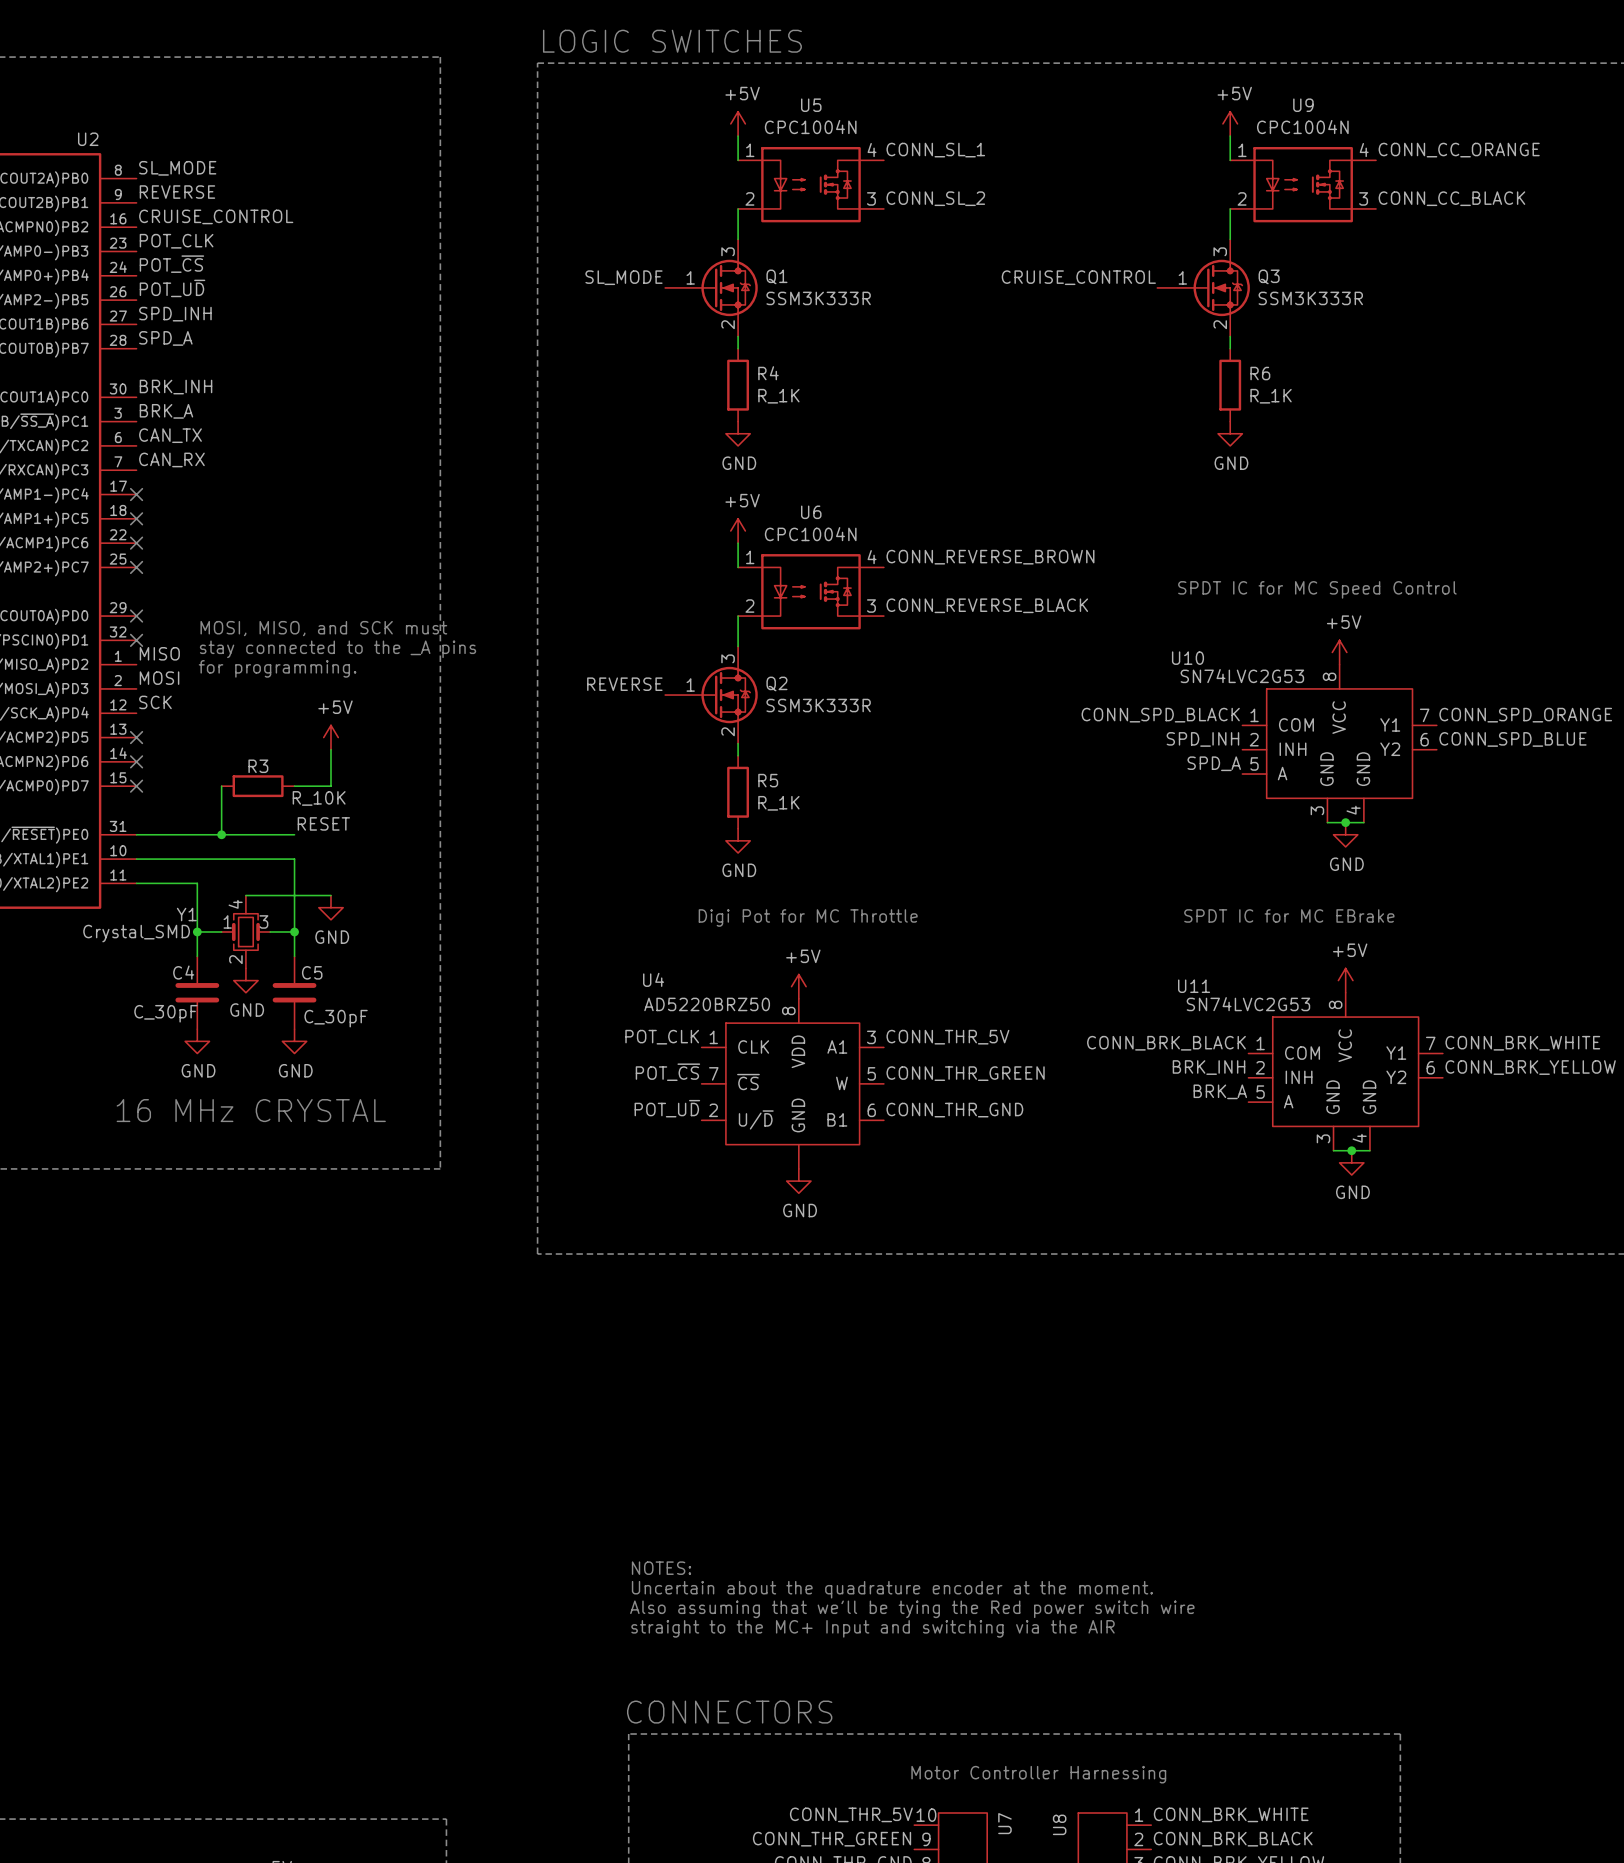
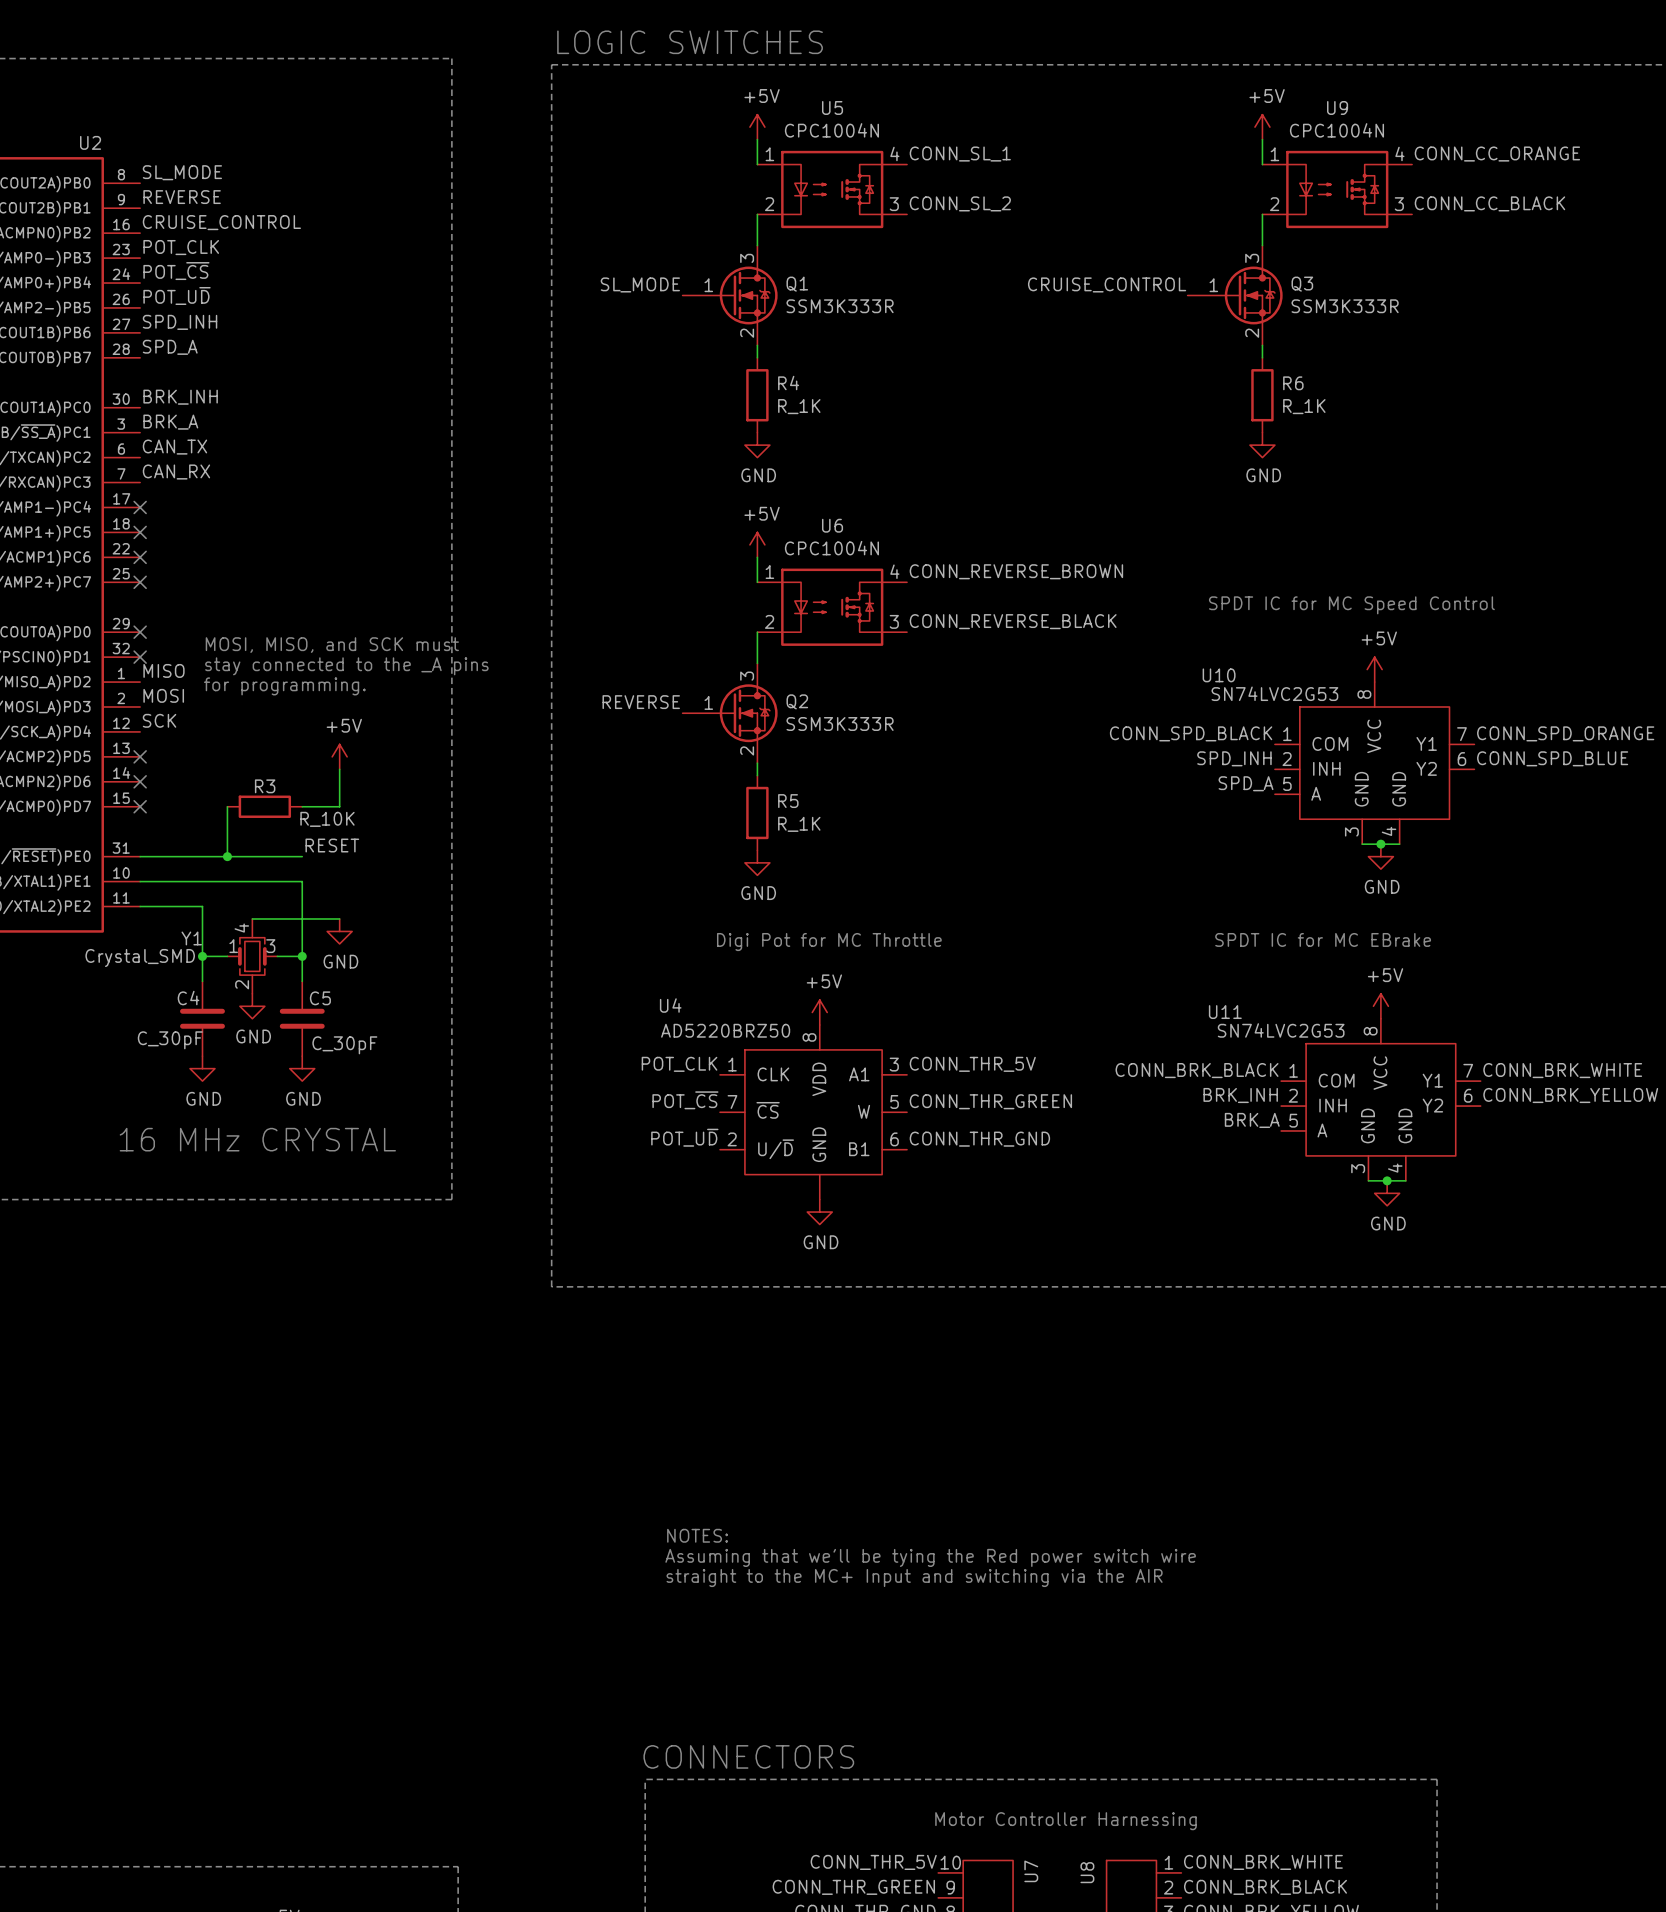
text: none -> Assuming that we'll be tying the Red power switch wire (930, 1557)
text position: NOTES: (661, 1568) -> NOTES: (697, 1535)
text: Uncertain about the quadrature encoder at the moment. (892, 1589) -> none
text: Also assuming that we'll be tying the Red power switch wire (912, 1609) -> none
text position: straight to the MC+ Input and switching via the AIR (872, 1628) -> straight to the MC+ Input and switching via the AIR (914, 1578)

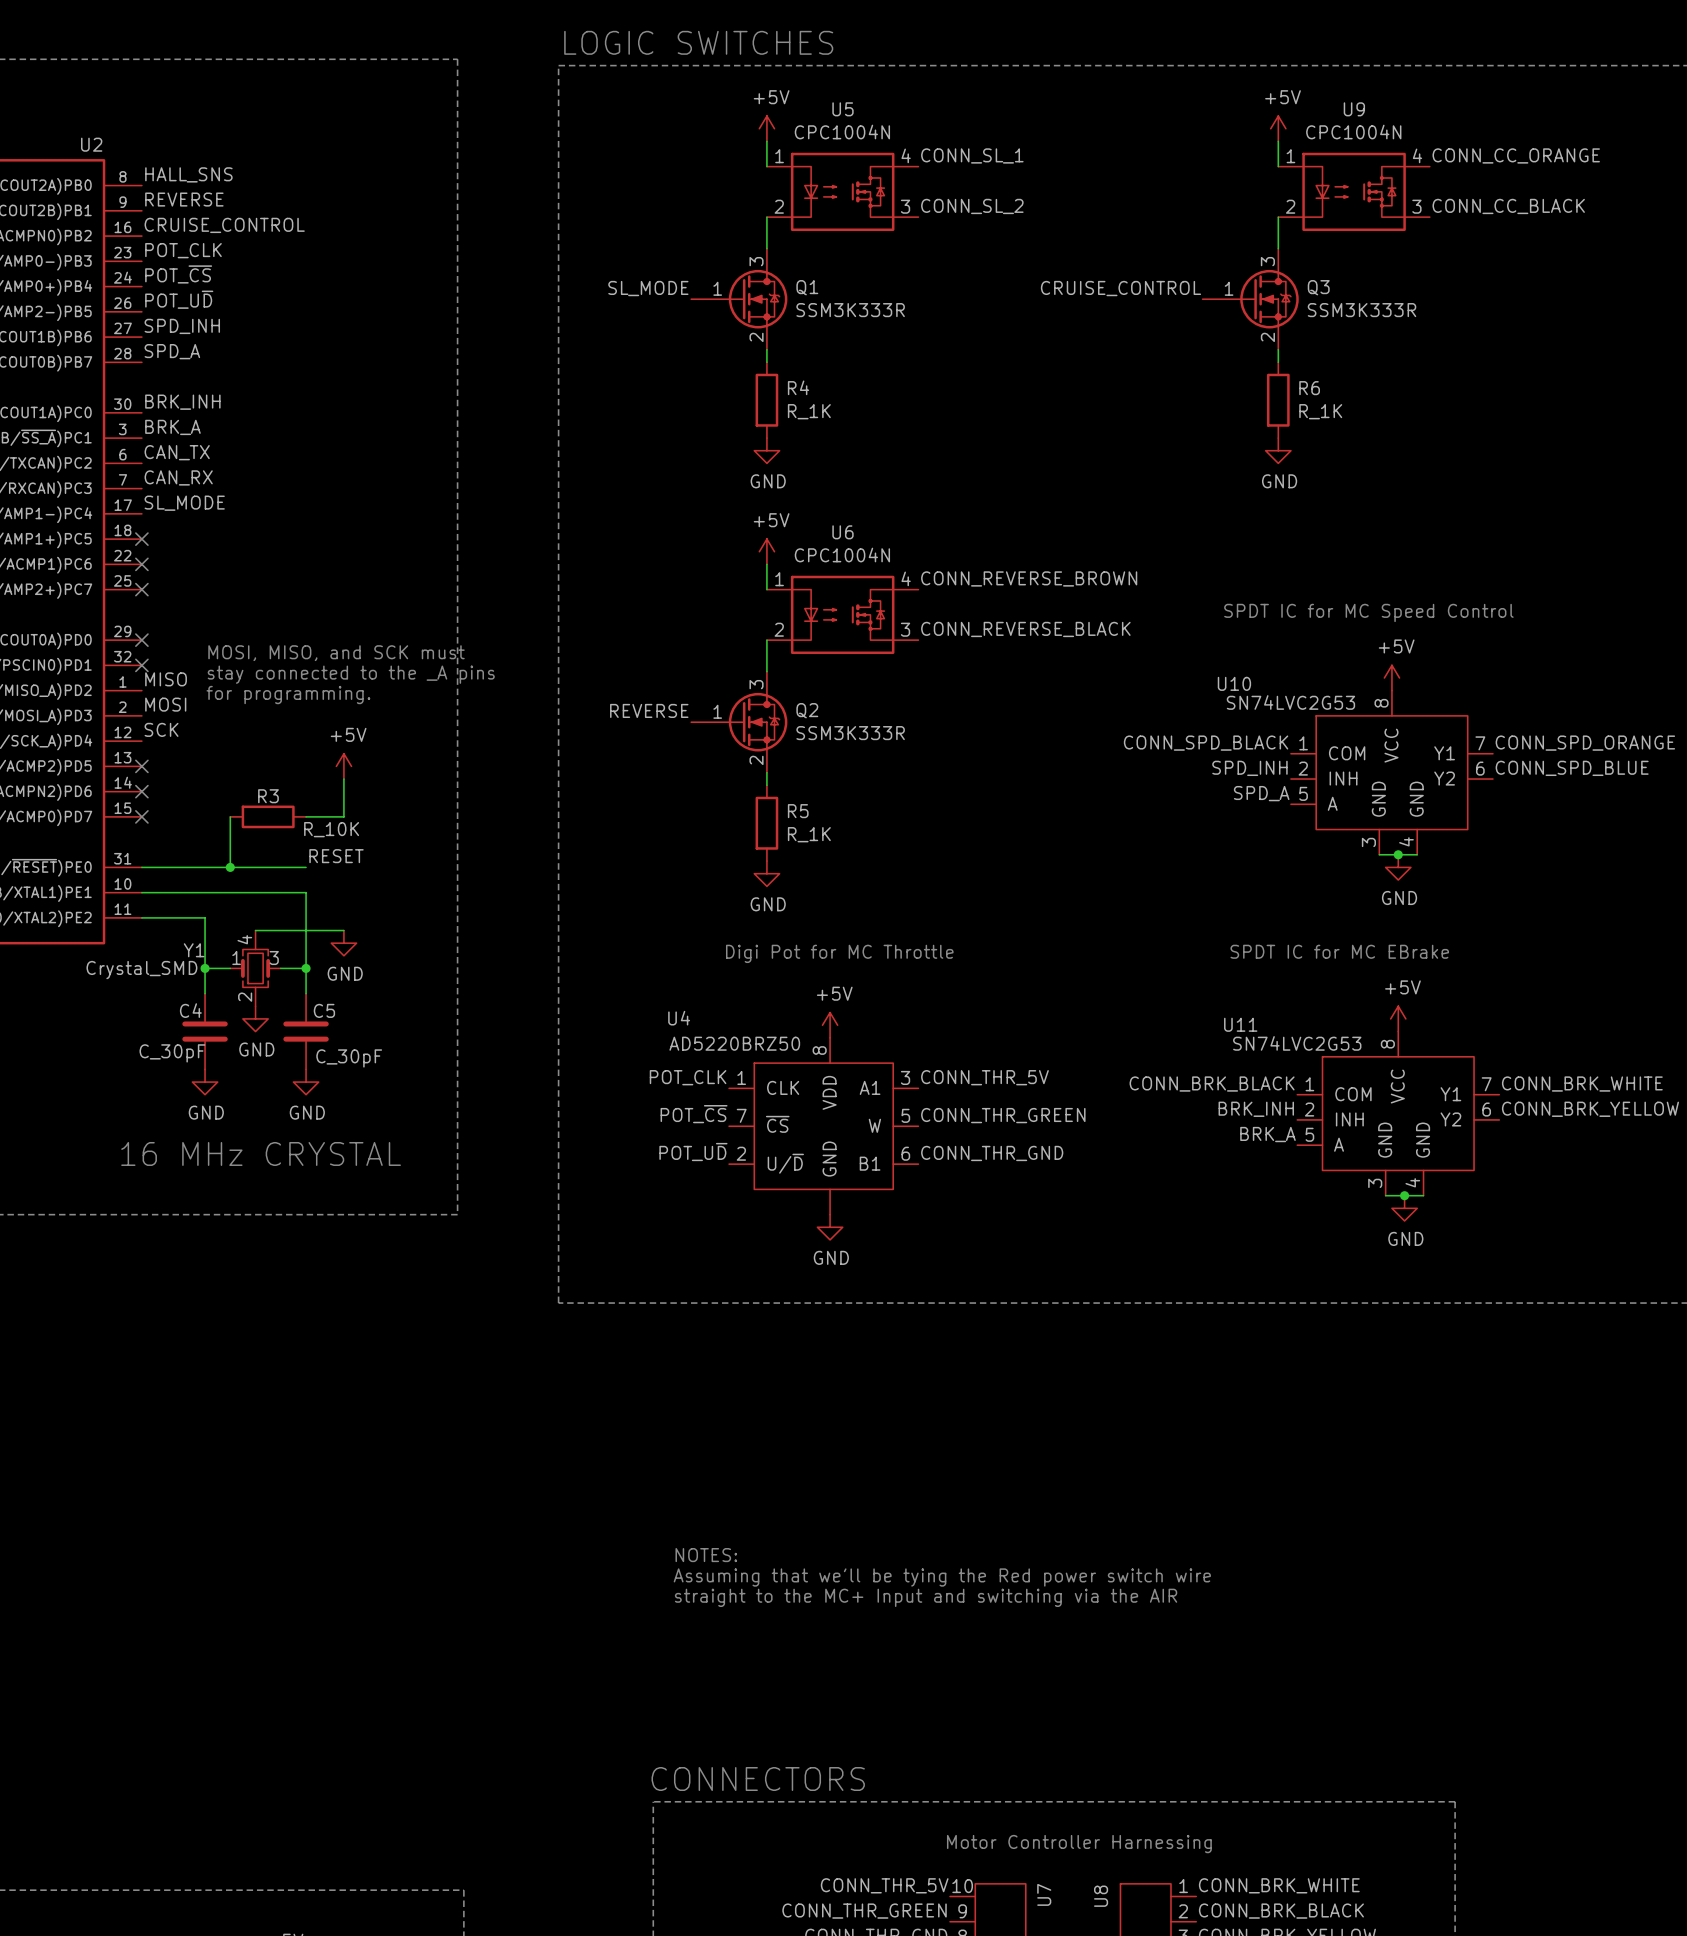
label: SL_MODE (182, 172) -> HALL_SNS (188, 174)
label: none -> SL_MODE (184, 503)
no-connect mark: (140, 507) -> none

